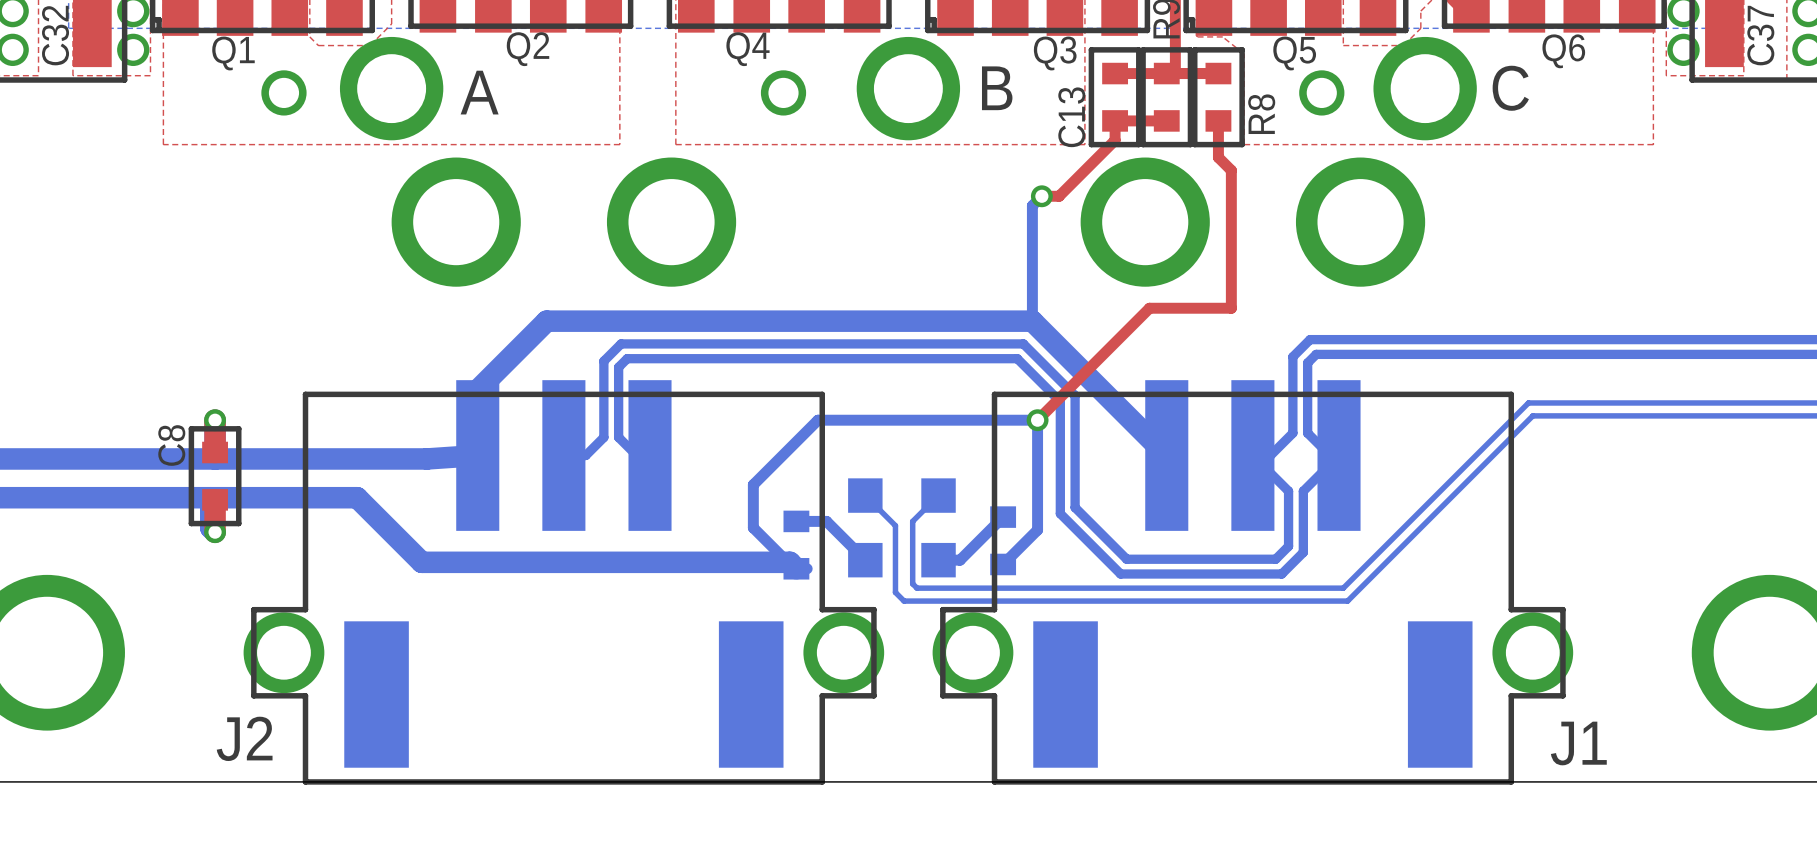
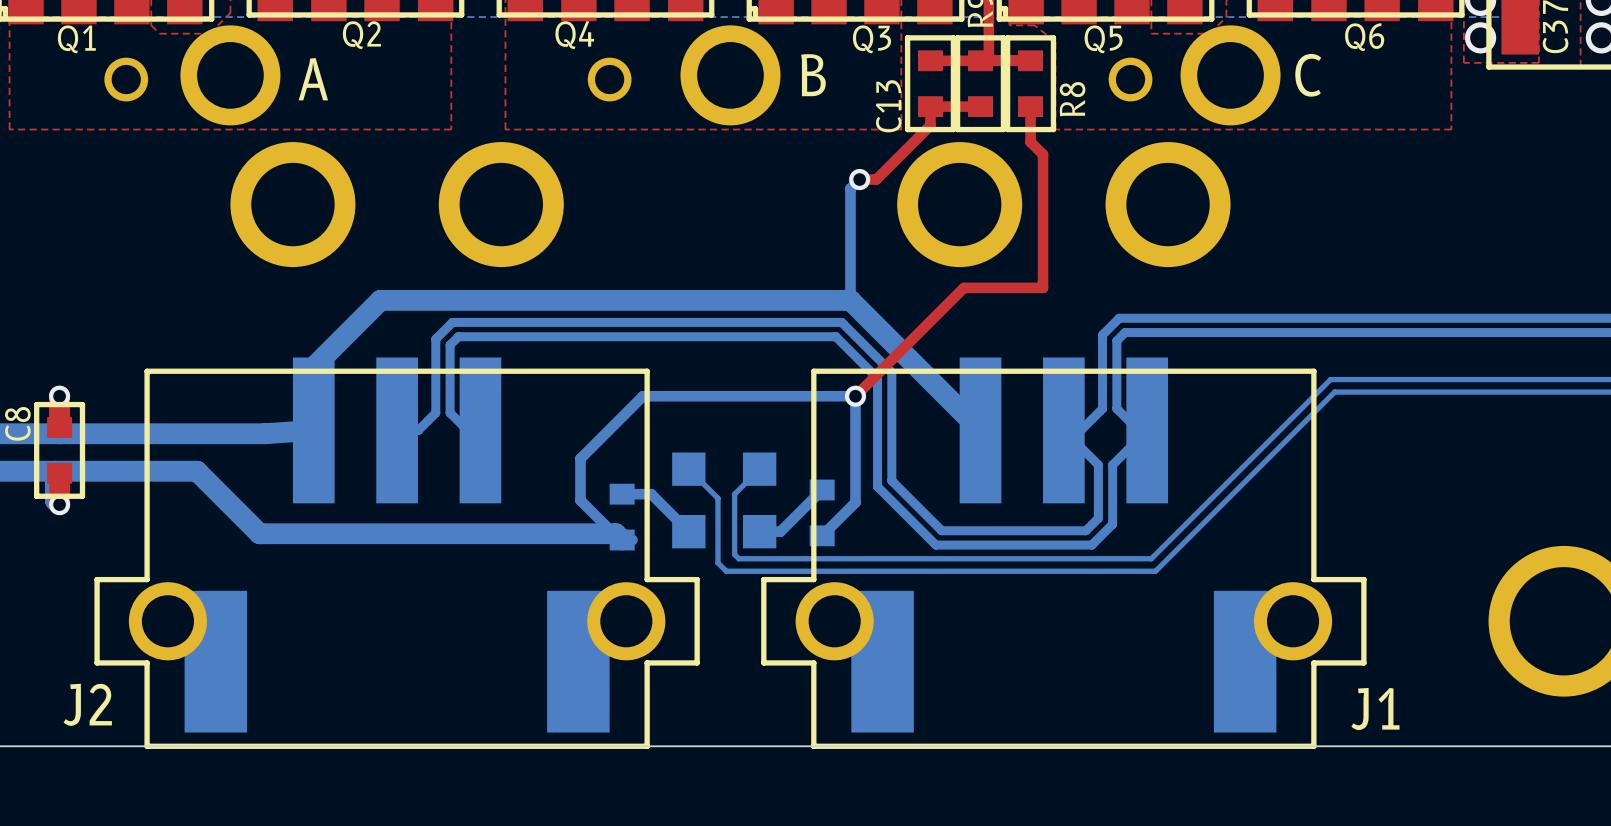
J2 footprint: [243, 157, 885, 785] -> [94, 142, 700, 749]
J1 footprint: [932, 157, 1574, 785] -> [761, 142, 1367, 749]

